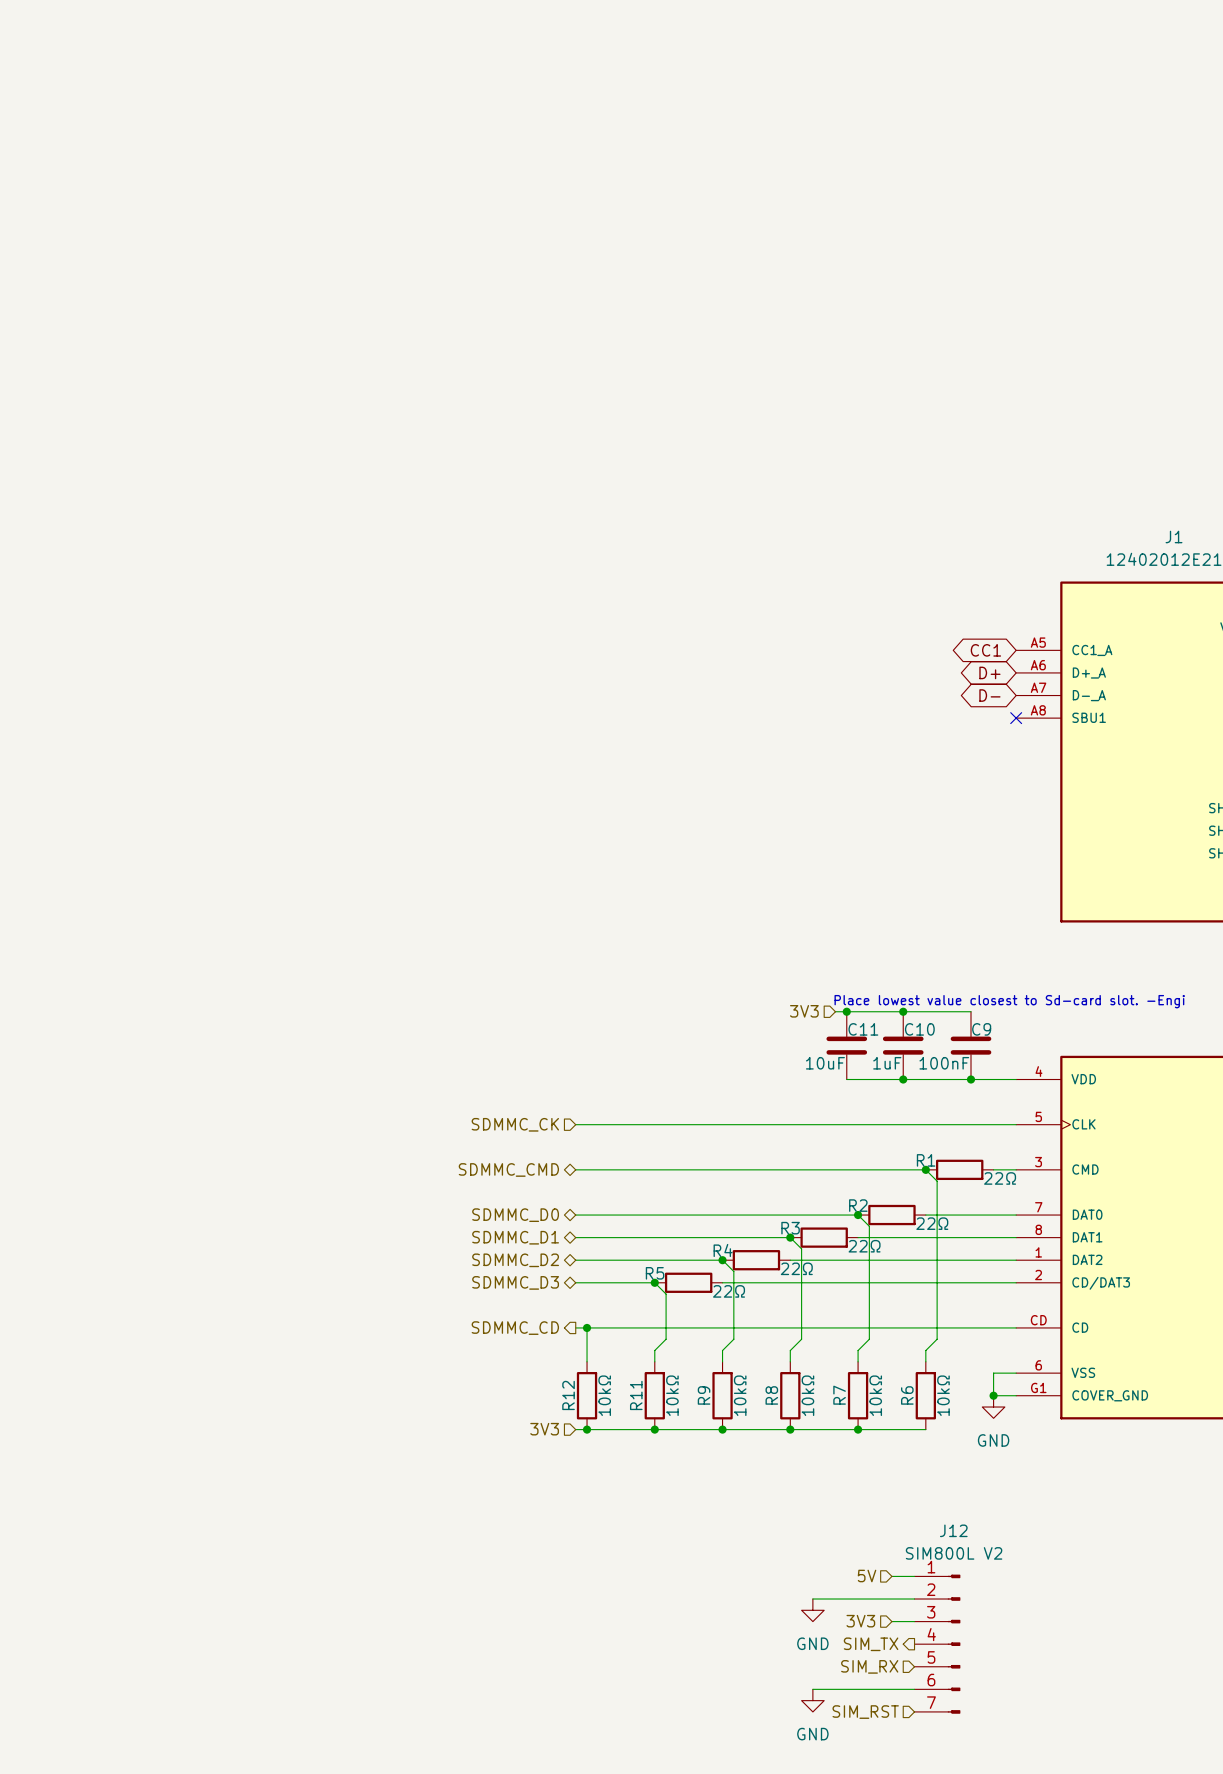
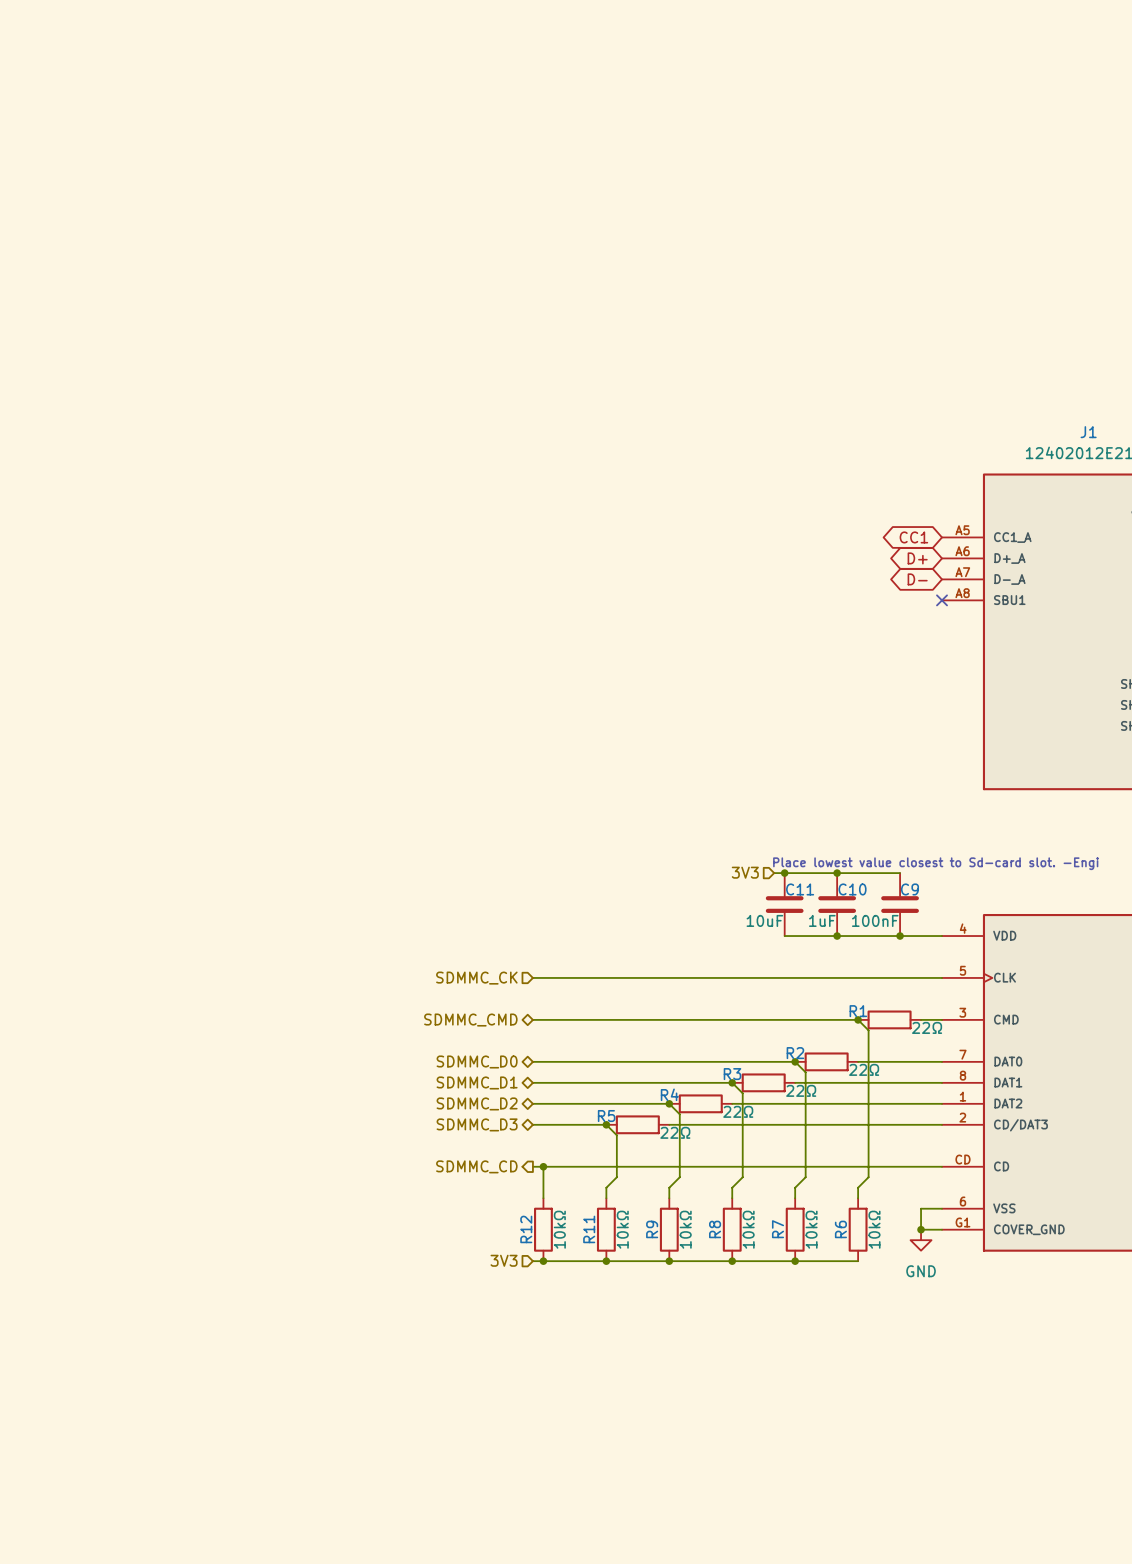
hierarchical label: 5V (867, 1575) -> none
wire: (891, 1576) (914, 1576) -> none
wire: (812, 1599) (914, 1599) -> none
power symbol: GND (812, 1610) -> none
hierarchical label: 3V3 (860, 1621) -> none
wire: (891, 1621) (914, 1621) -> none
hierarchical label: SIM_TX (871, 1644) -> none
J12: SIM800L V2 (937, 1644) -> none
hierarchical label: SIM_RX (869, 1666) -> none
wire: (812, 1689) (914, 1689) -> none
power symbol: GND (812, 1700) -> none
hierarchical label: SIM_RST (865, 1712) -> none

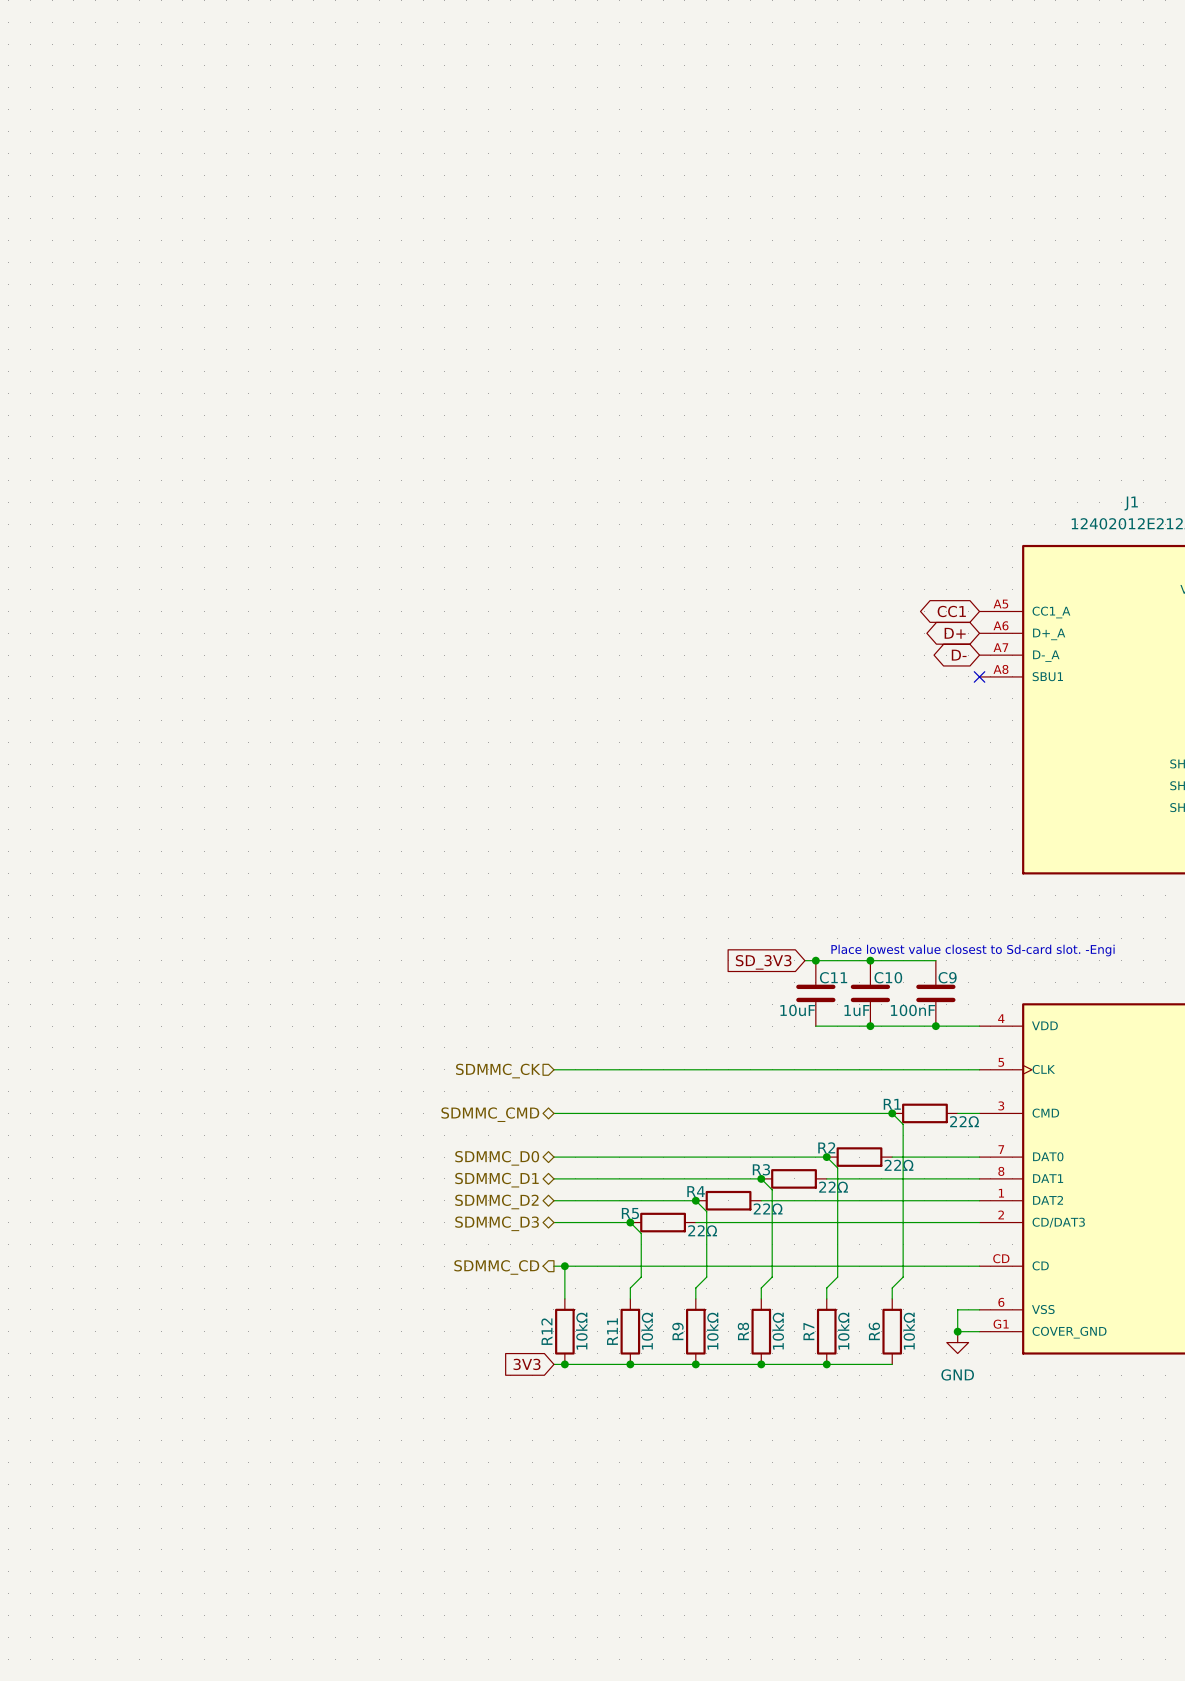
hierarchical label: 3V3 (745, 872) -> none
global label: none -> SD_3V3 (763, 962)
hierarchical label: 3V3 (504, 1260) -> none
global label: none -> 3V3 (527, 1364)

